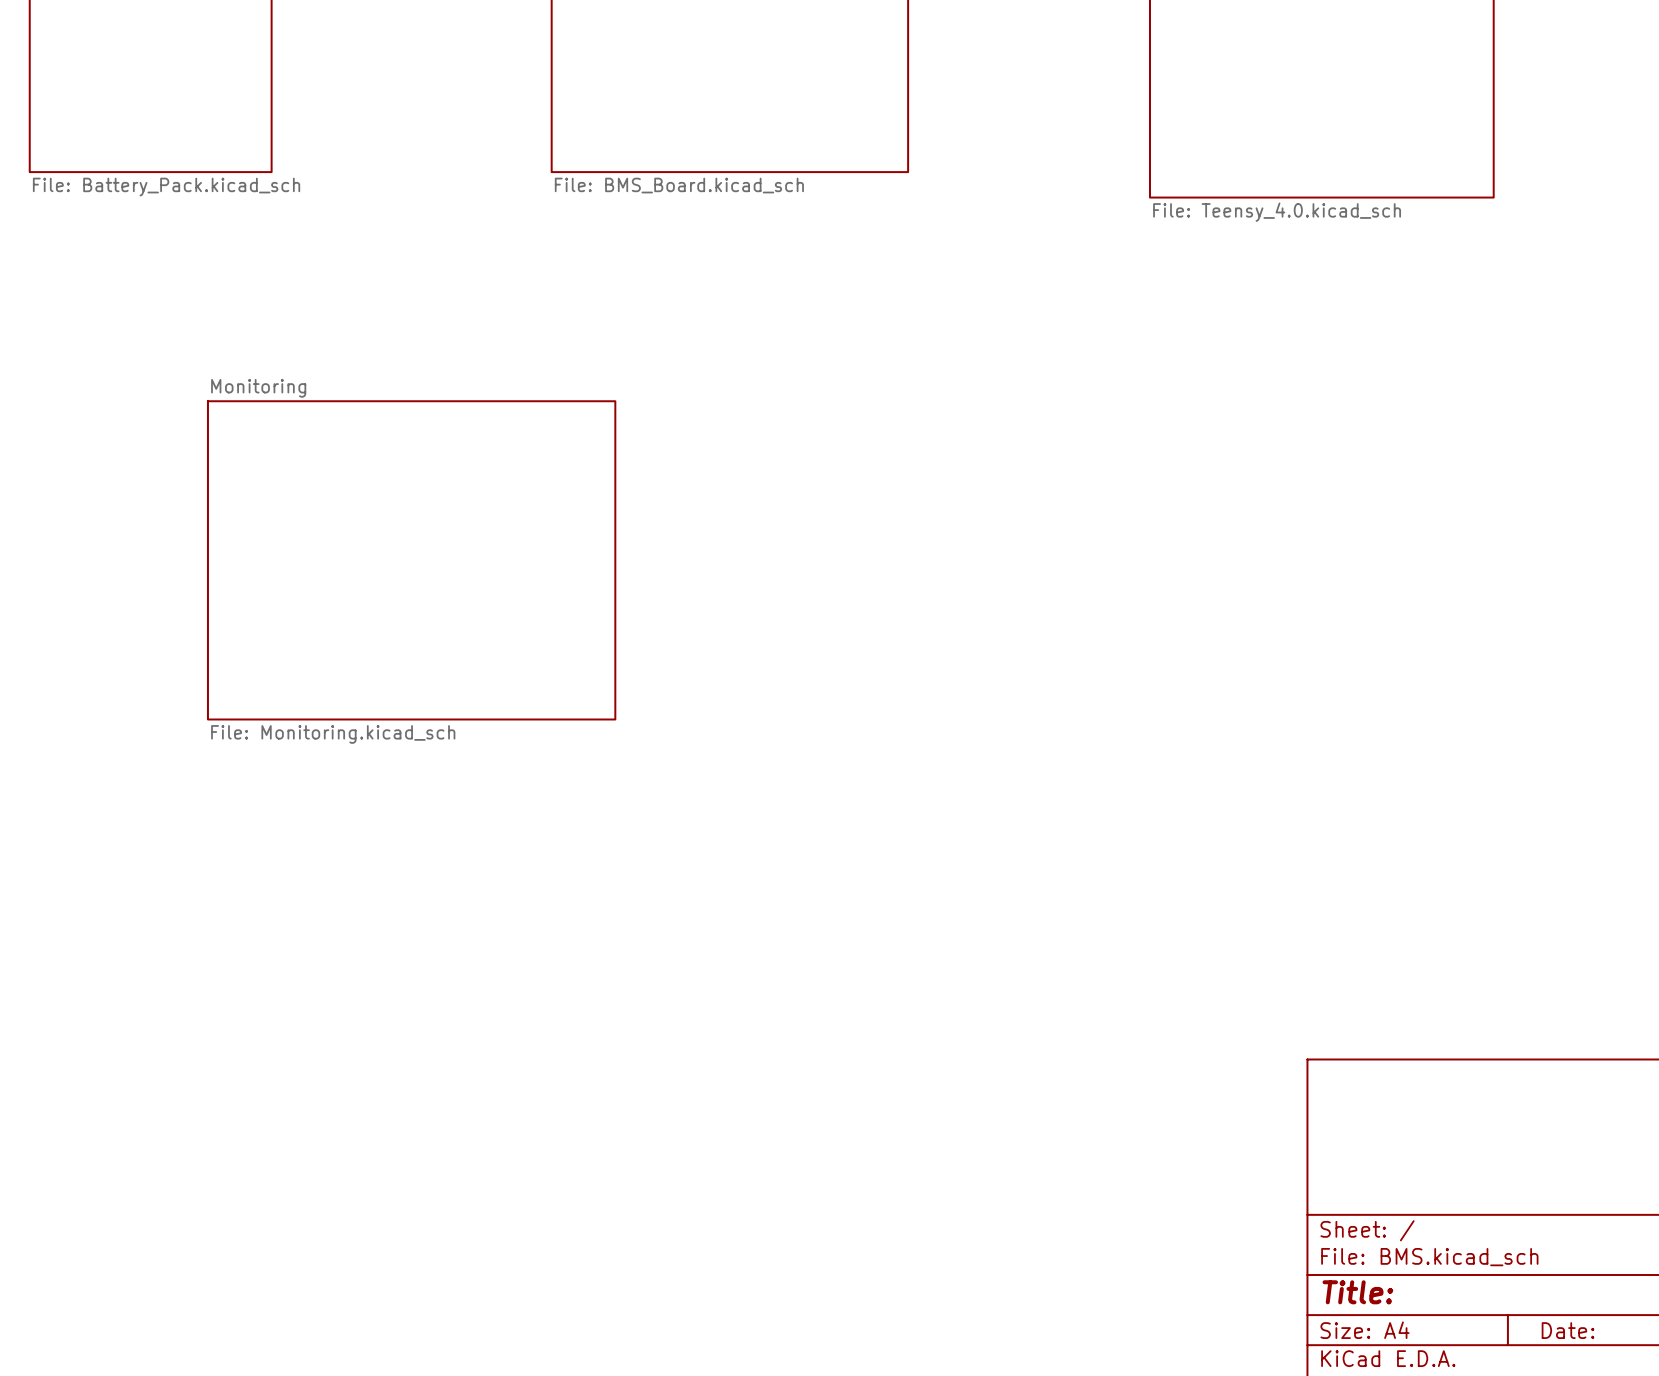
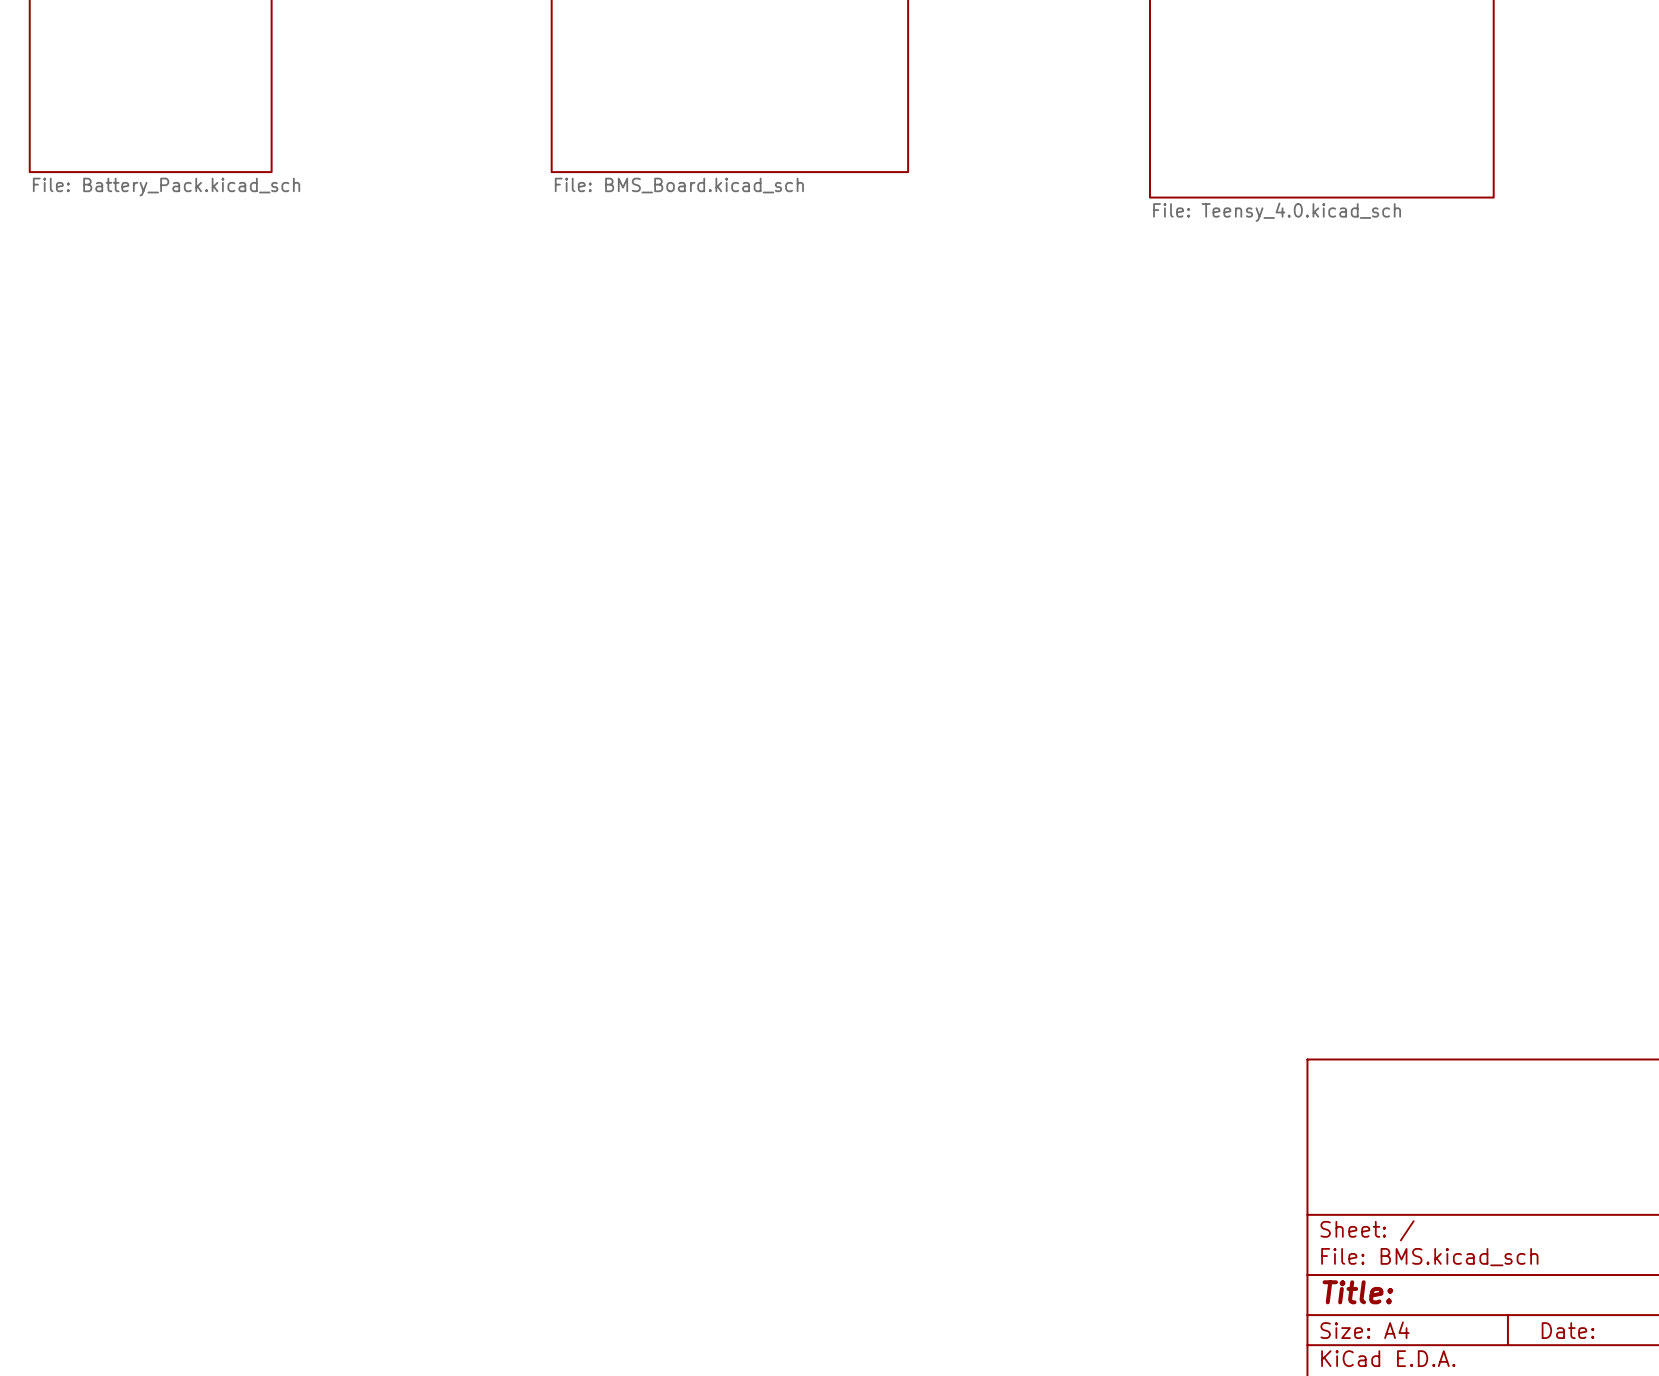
sheet Monitoring: File: Monitoring.kicad_sch (411, 560) -> none

